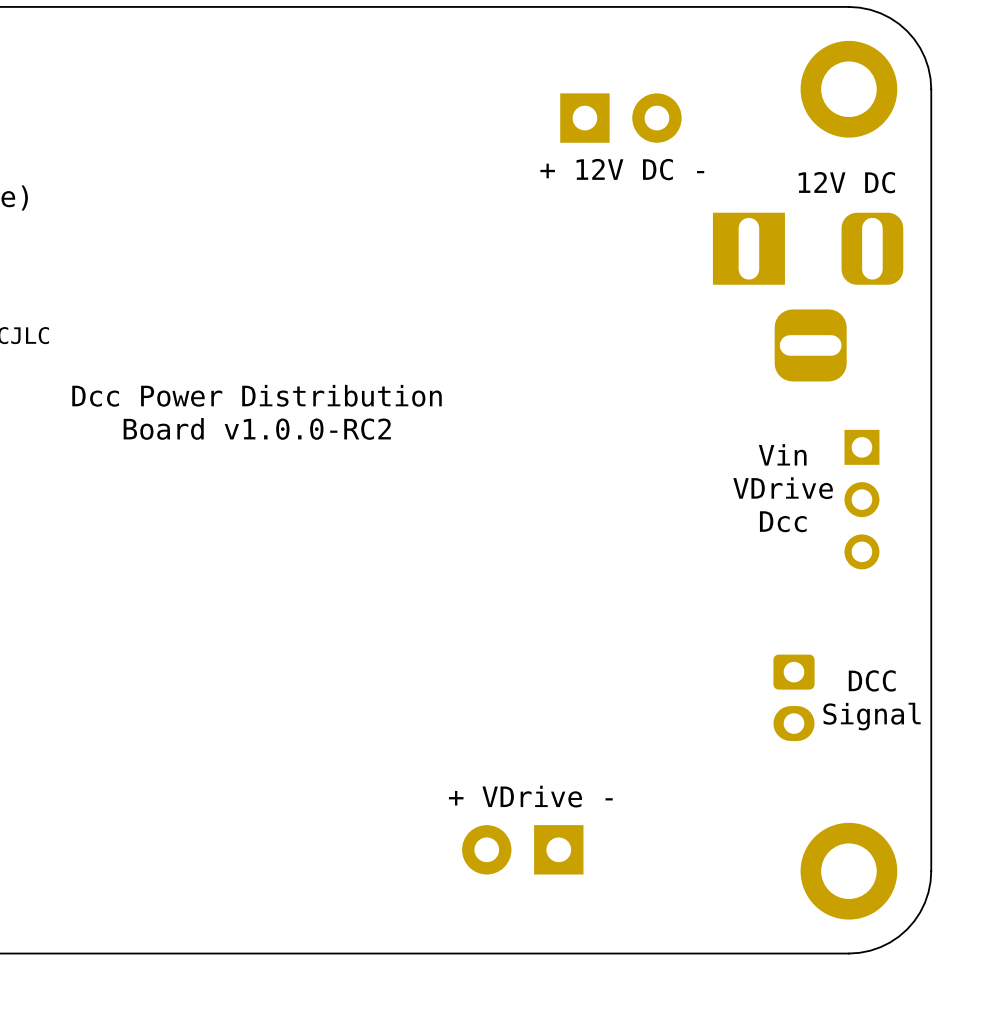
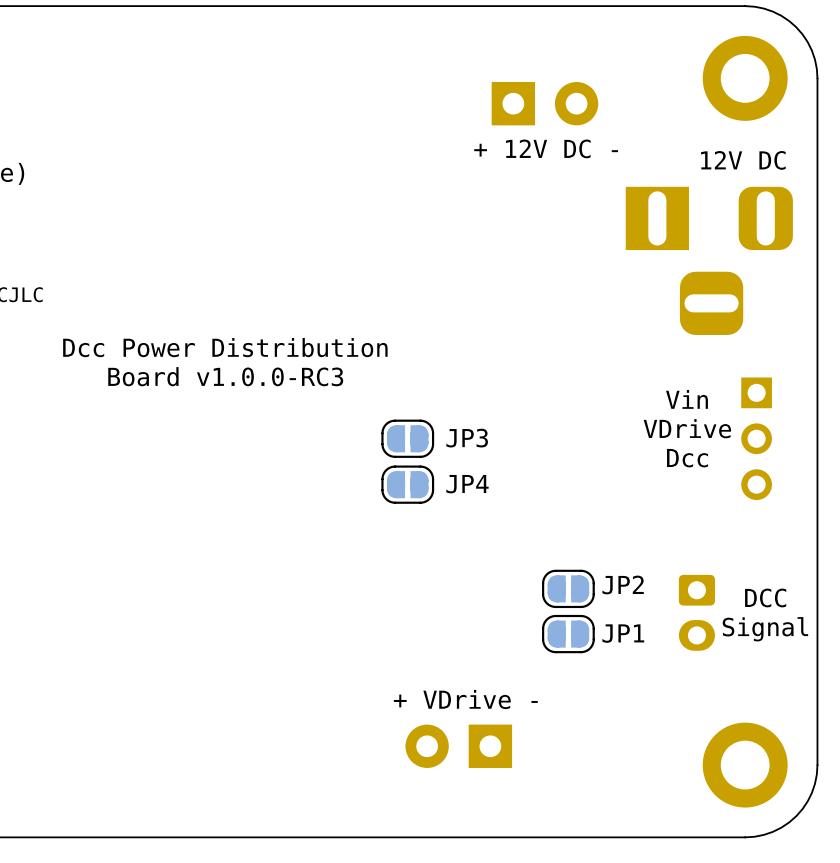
text: Board v1.0.0-RC2 (257, 428) -> Board v1.0.0-RC3 (225, 376)
JP3: none -> (407, 438)
JP4: none -> (407, 484)
JP2: none -> (568, 588)
JP1: none -> (568, 634)

